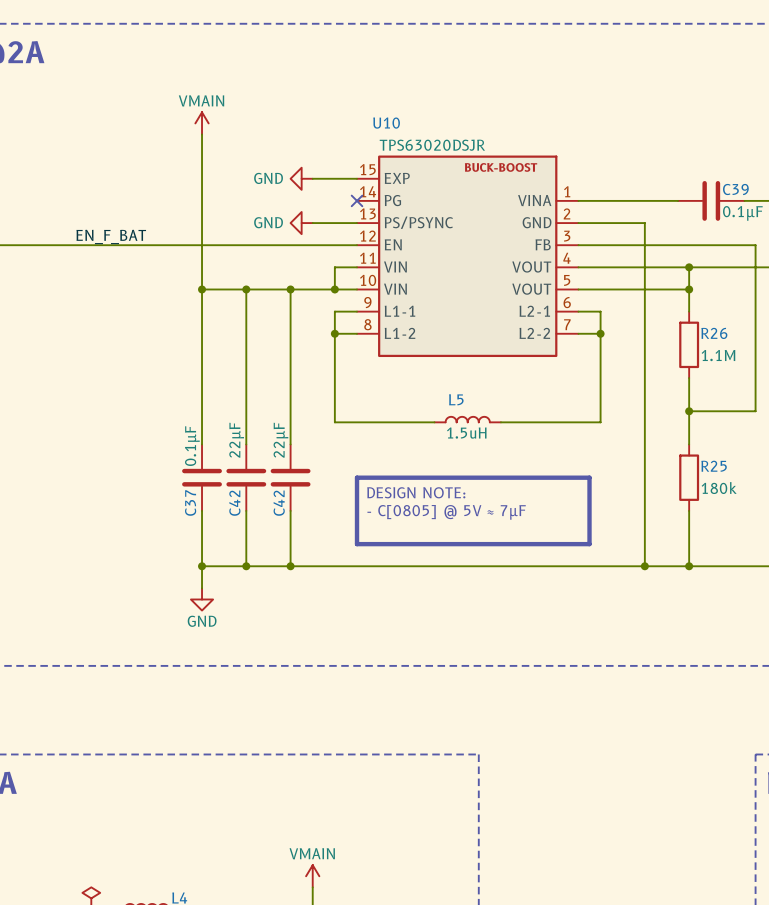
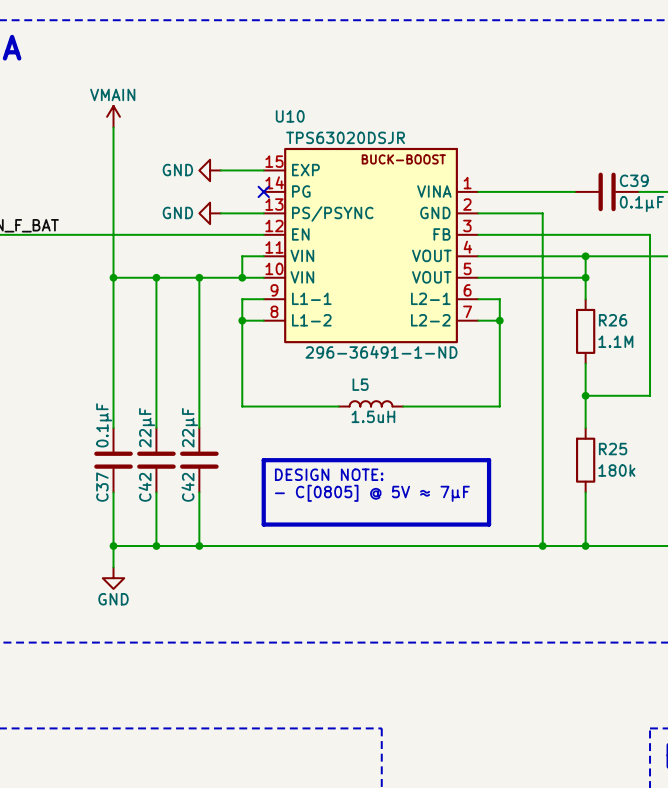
U10 text: none -> 296-36491-1-ND (381, 352)

